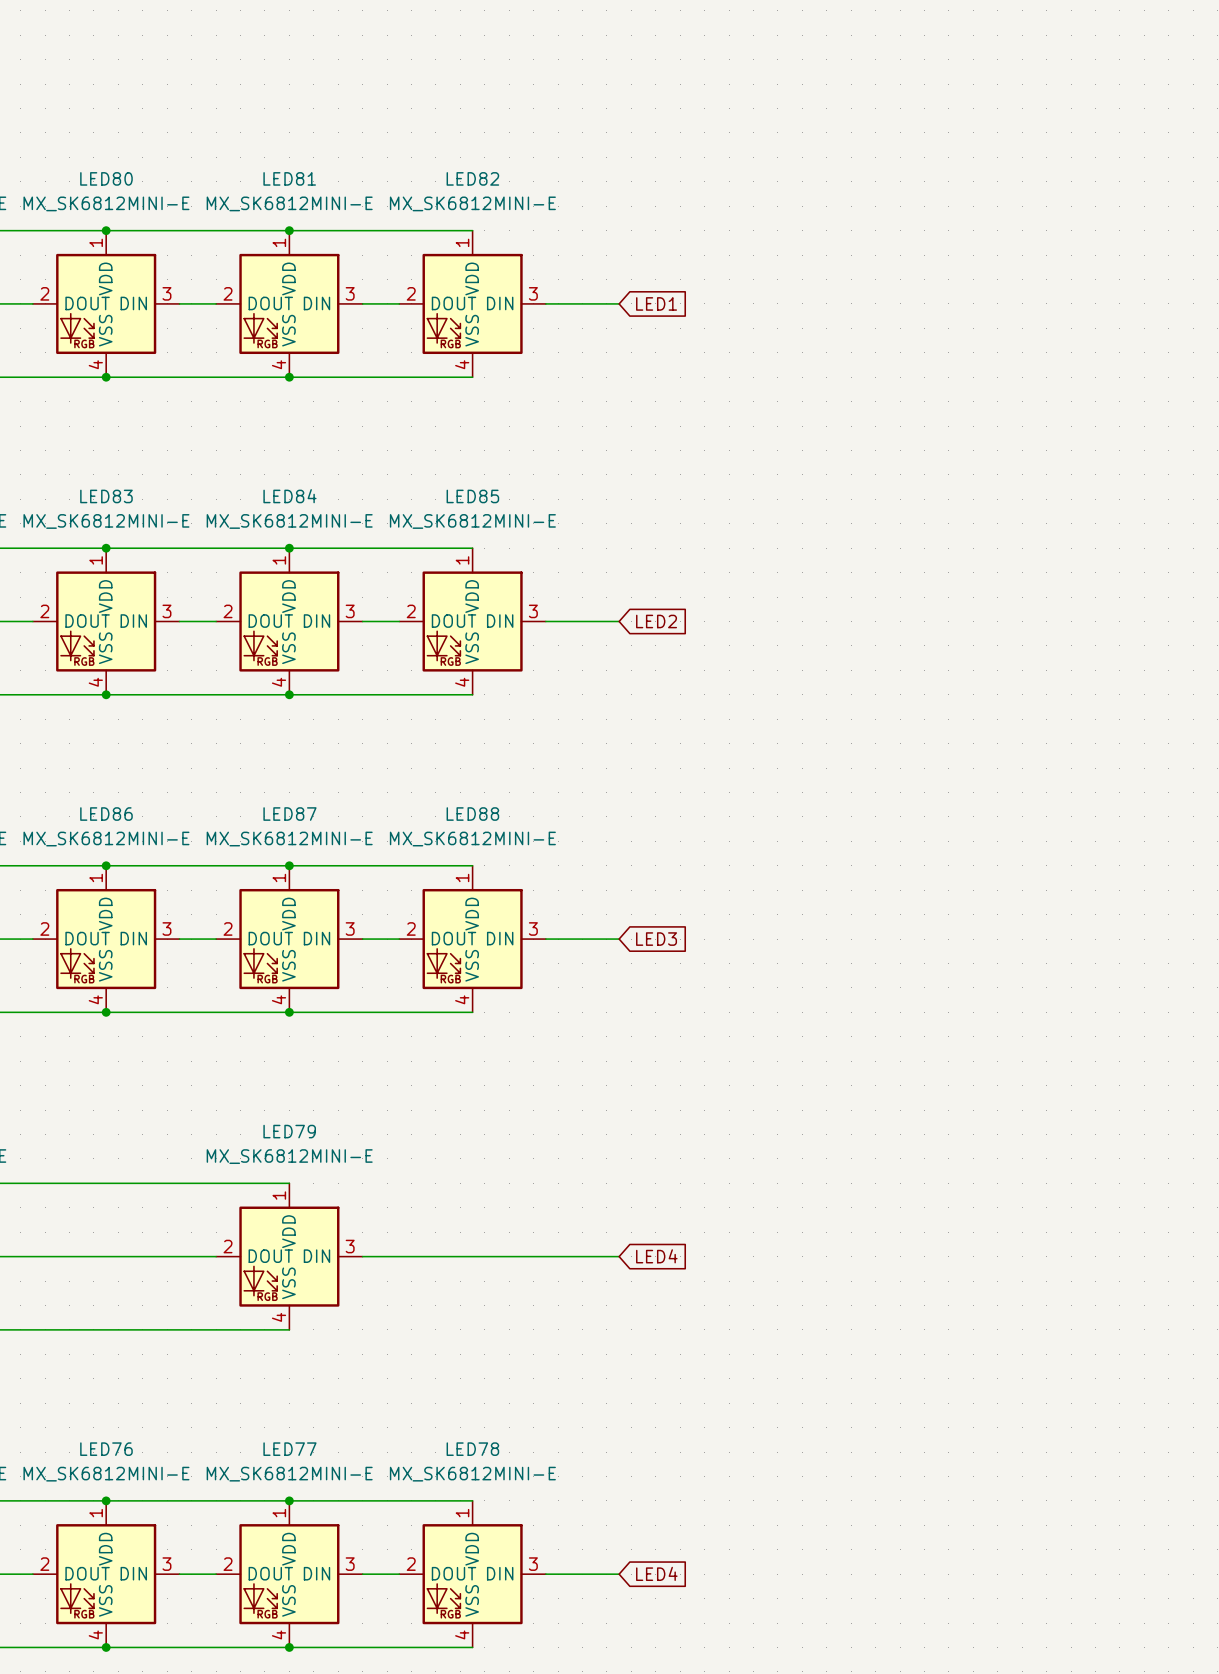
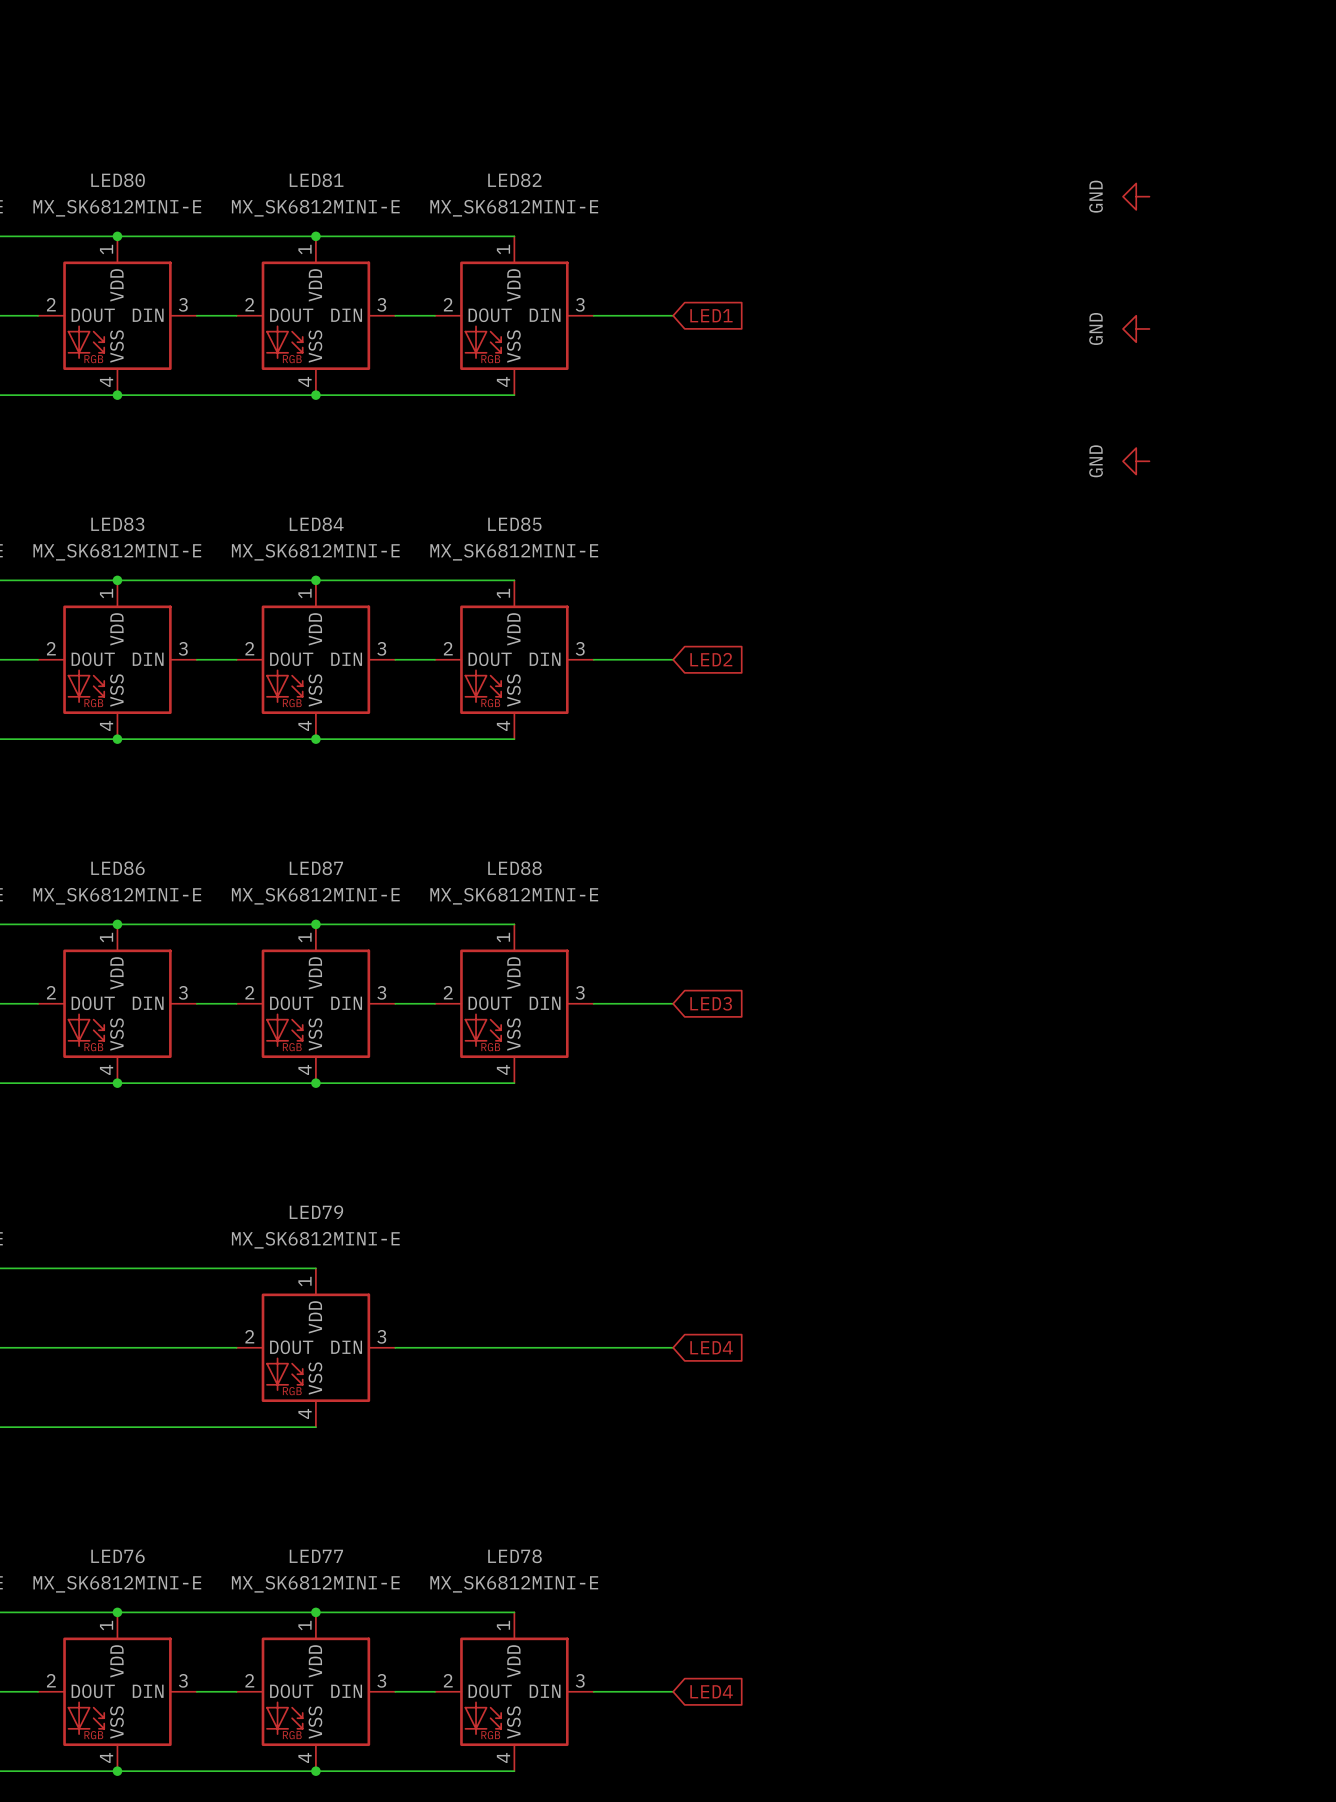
power symbol: none -> GND (1136, 196)
power symbol: none -> GND (1136, 328)
power symbol: none -> GND (1136, 461)

